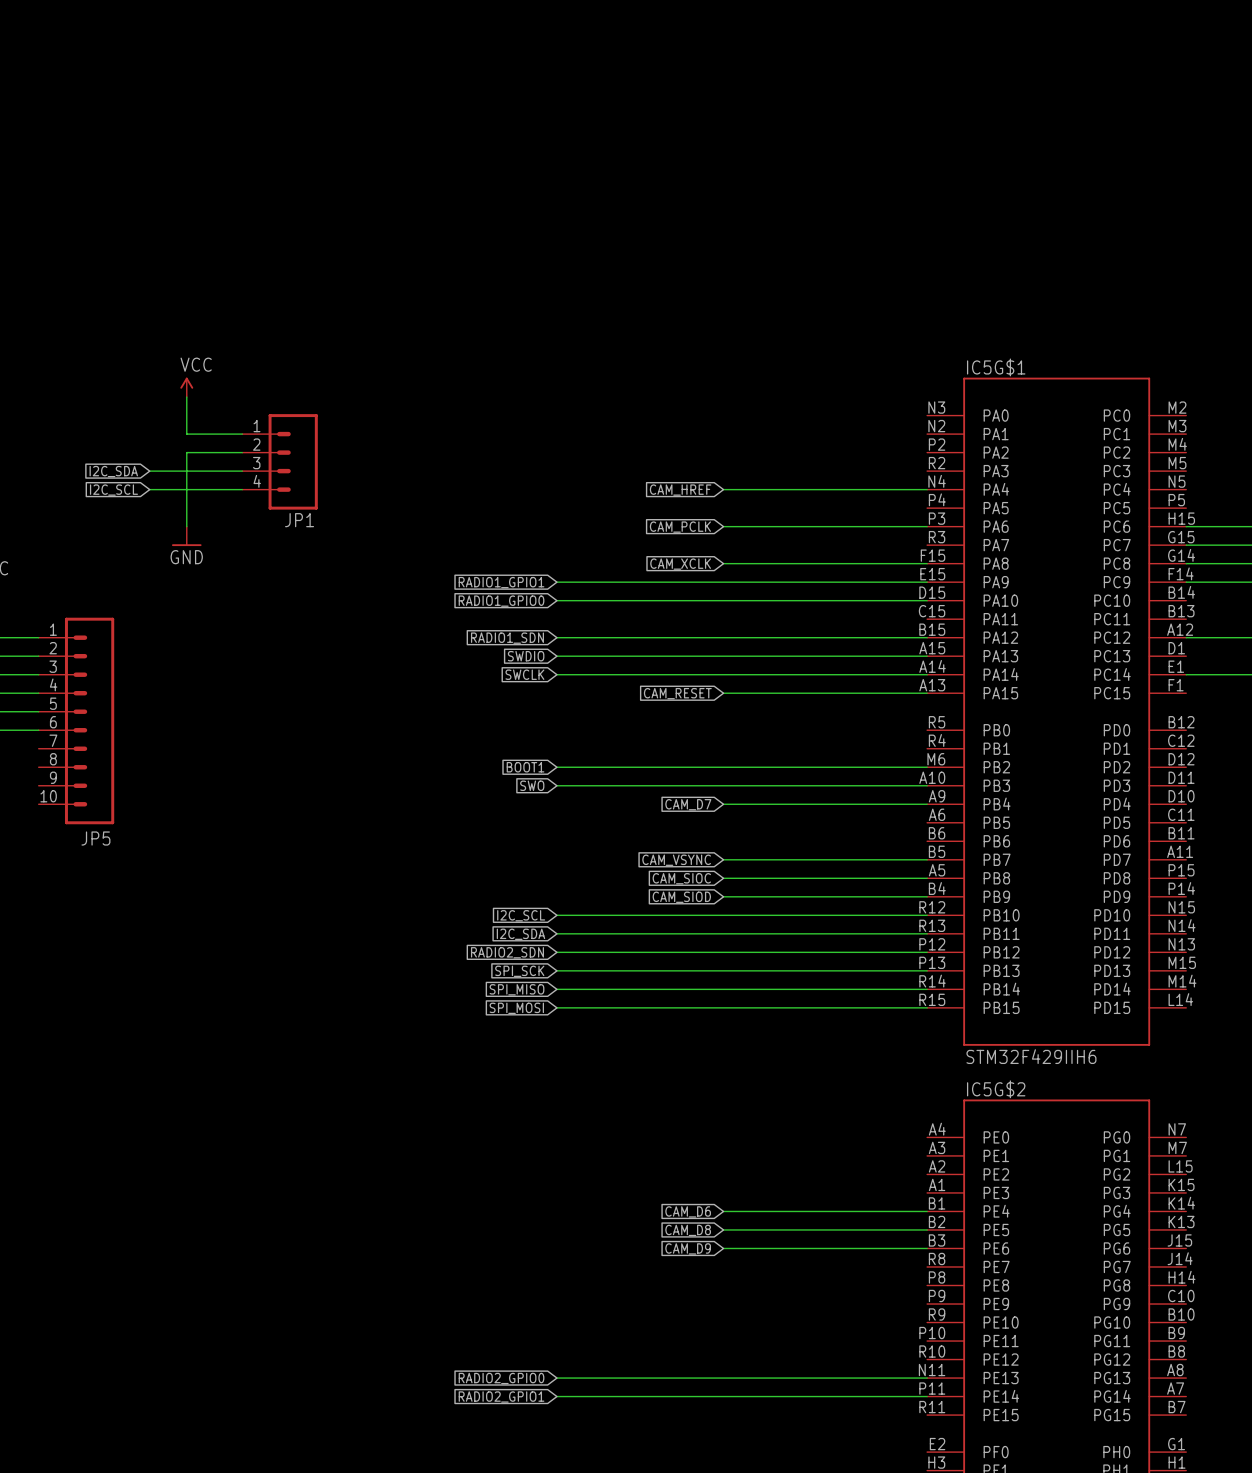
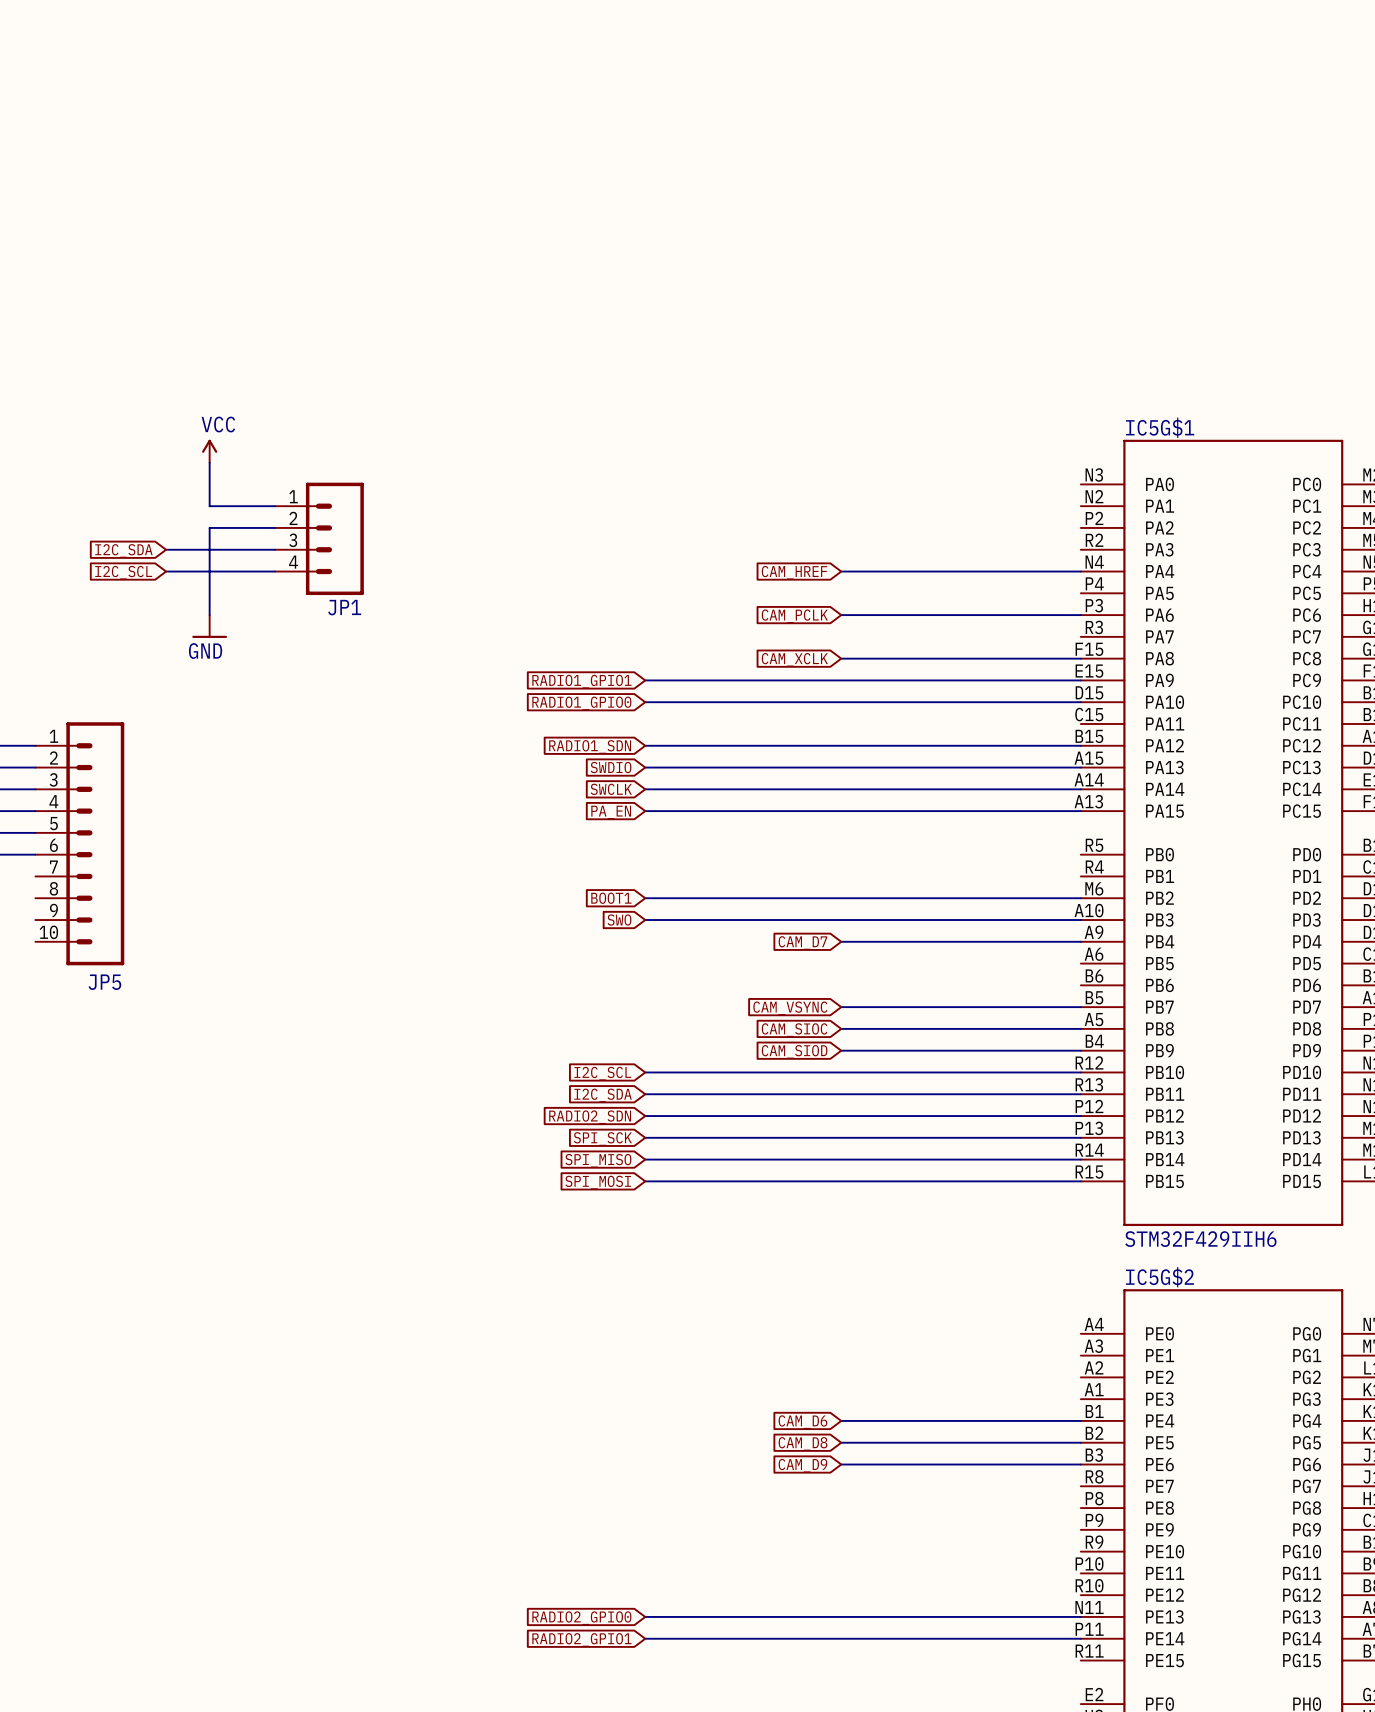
global label: none -> PA_EN (611, 812)
wire: none -> (645, 811) (841, 811)
global label: CAM_RESET (677, 693) -> none

